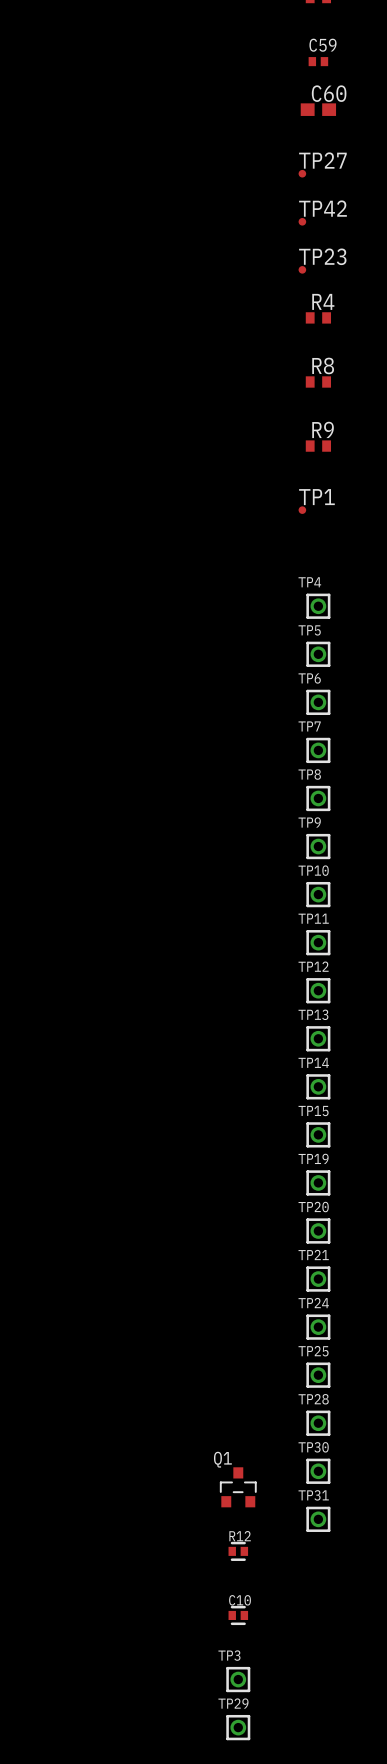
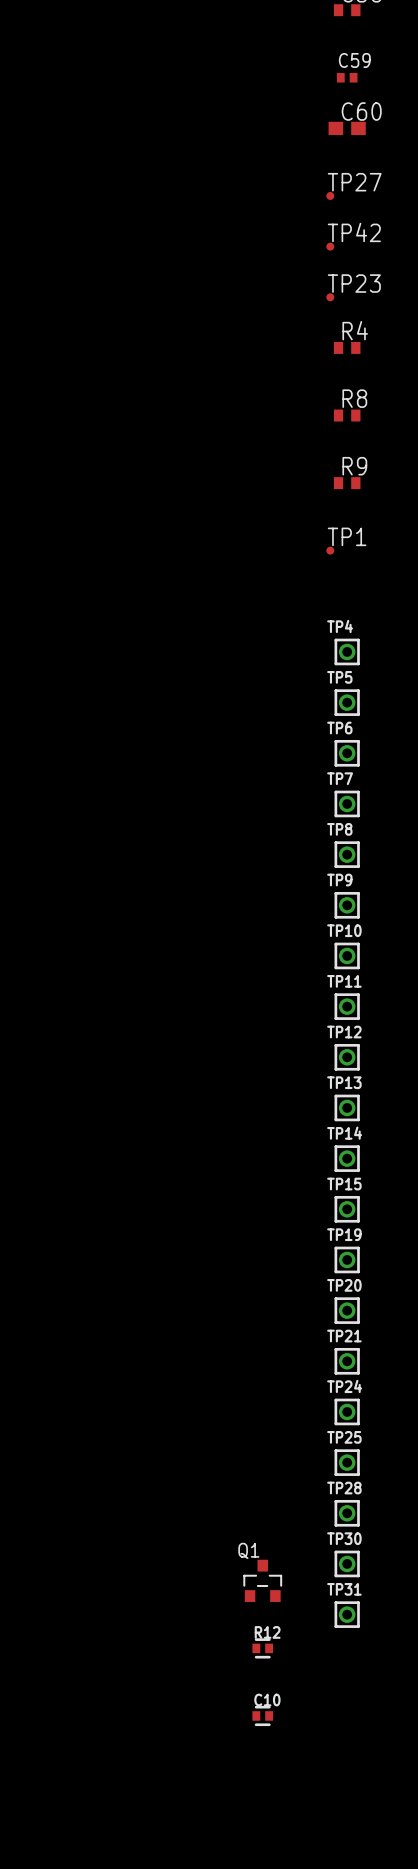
TP3: (238, 1679) -> none
TP29: (238, 1727) -> none

